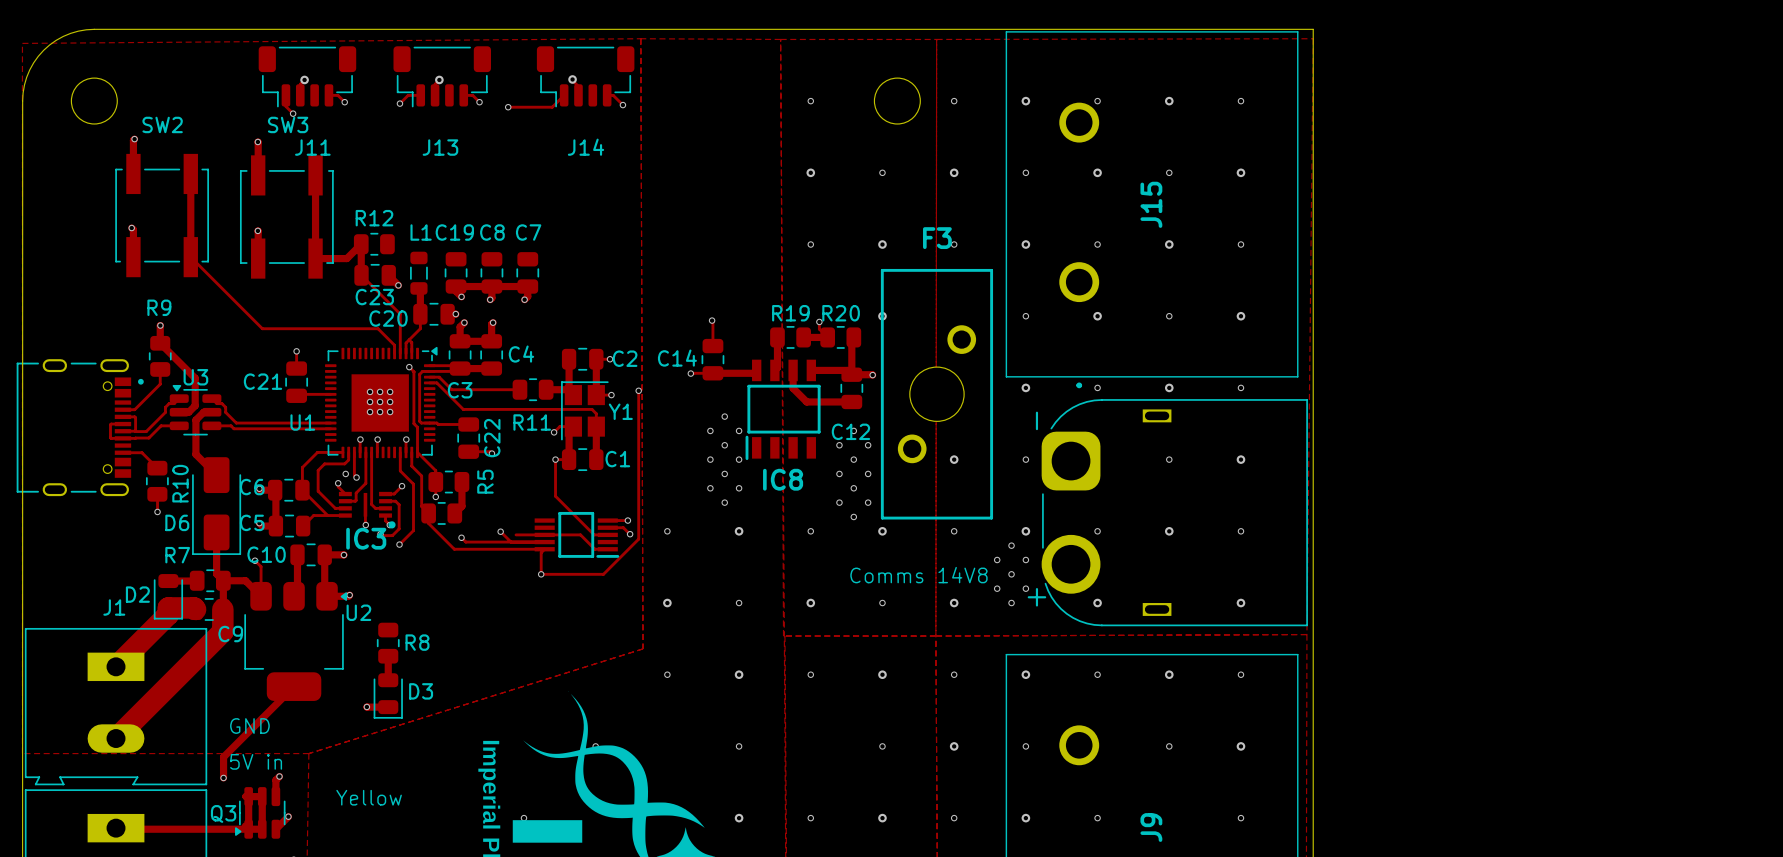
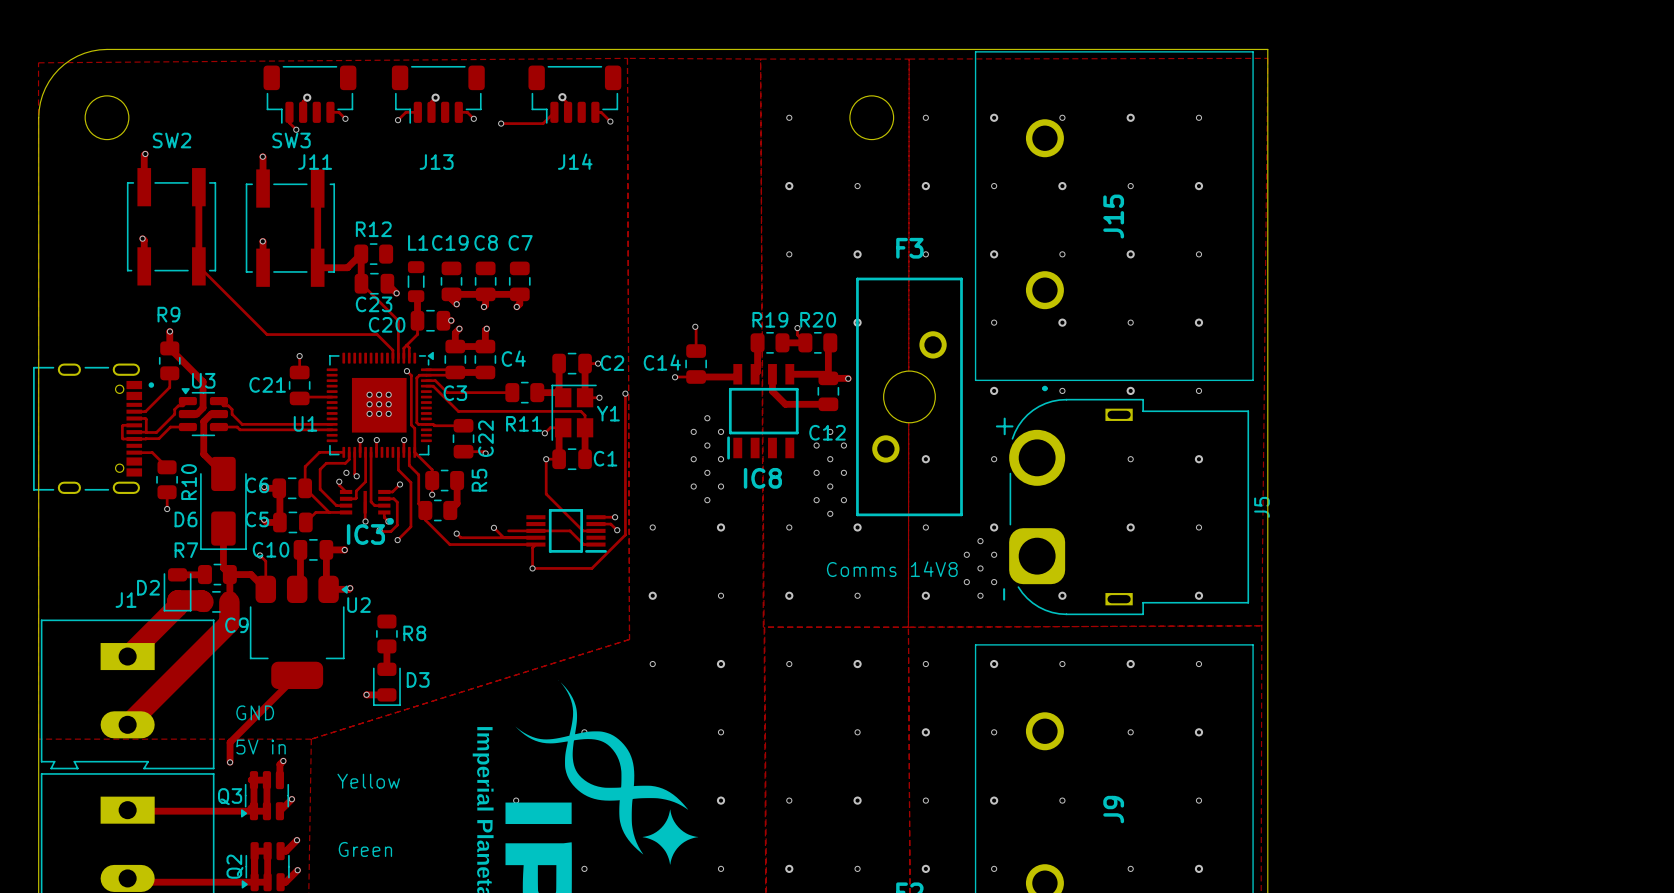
J5: none -> (1129, 506)
part: (1174, 512) -> none
via: (1097, 531) -> none

